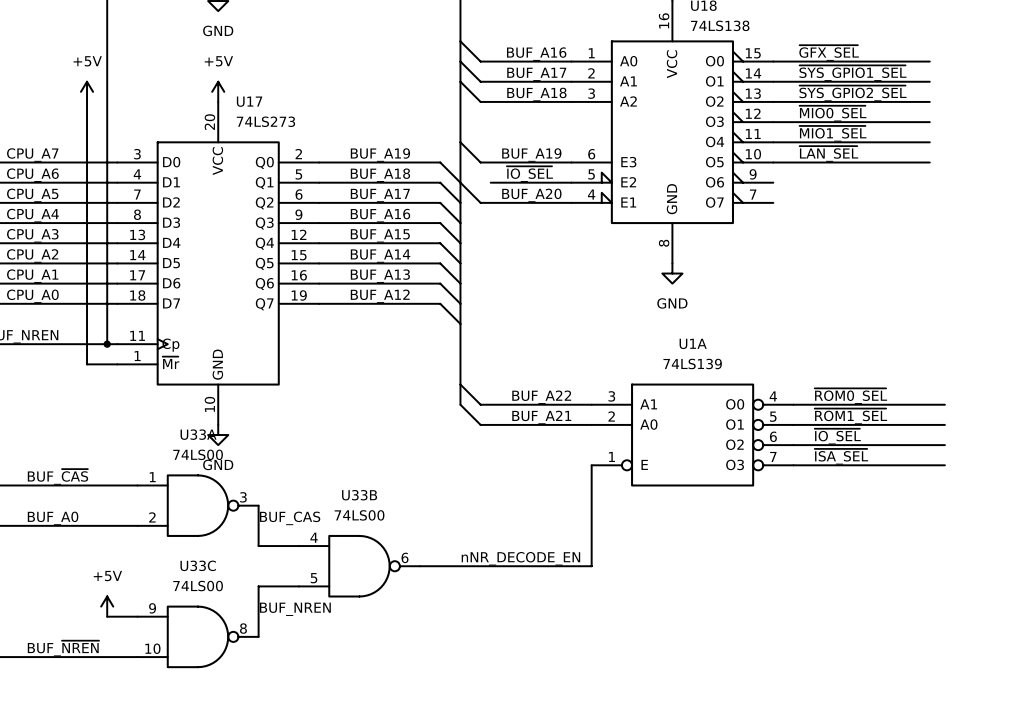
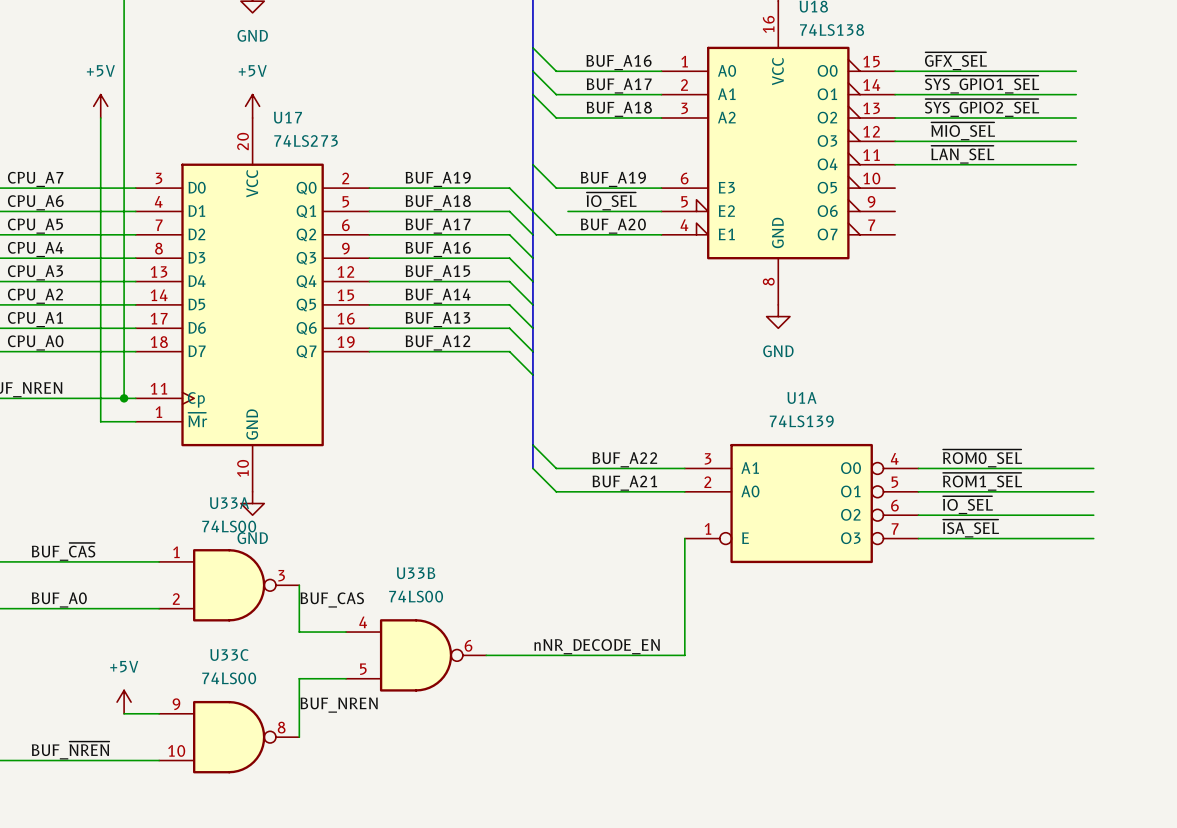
label: ~{MIO0_SEL} (832, 113) -> ~{MIO_SEL} (963, 131)
label: ~{MIO1_SEL} (832, 133) -> ~{LAN_SEL} (962, 154)
label: ~{LAN_SEL} (828, 153) -> none
wire: (773, 162) (929, 162) -> none

